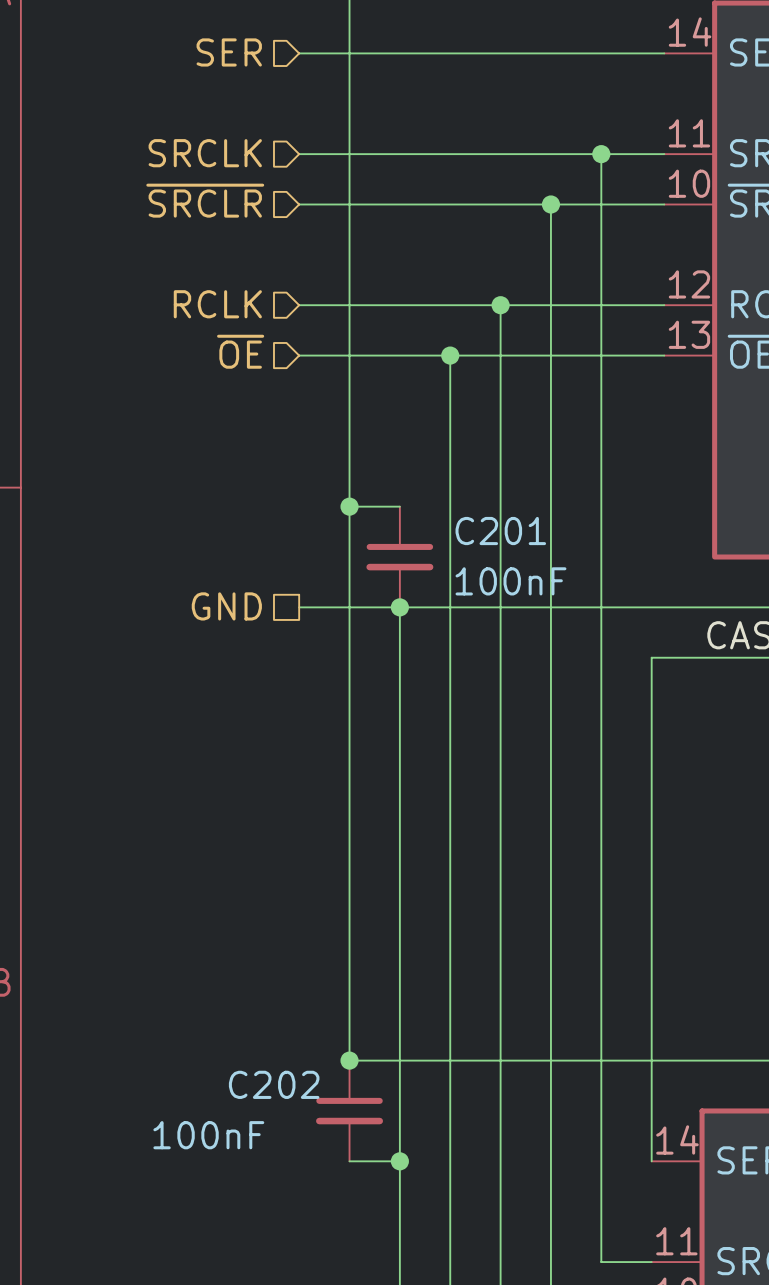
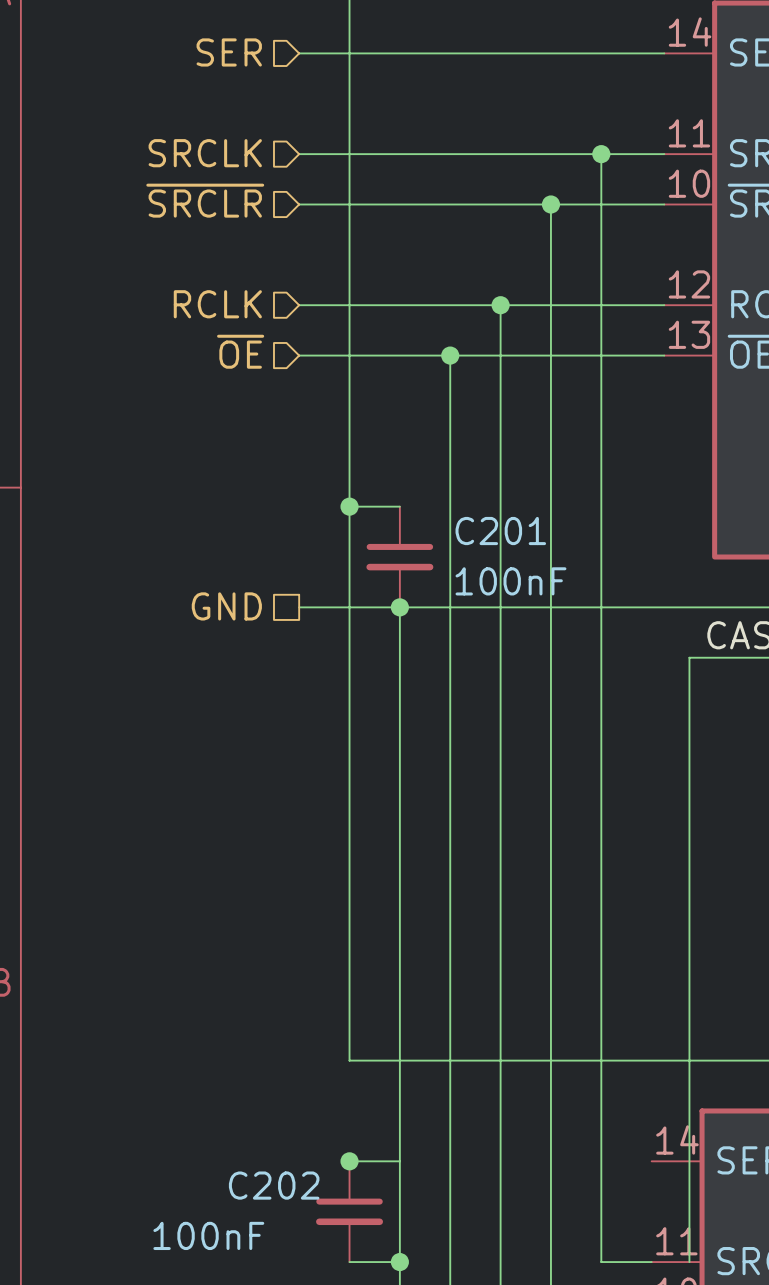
wire: (689, 657) (651, 657) (651, 1161) -> (689, 657) (689, 1262)
junction: (349, 1060) -> none
C202 position: (349, 1110) -> (349, 1211)
junction: none -> (349, 1161)
junction: (399, 1161) -> none
wire: none -> (349, 1262) (399, 1262)
junction: none -> (399, 1262)

